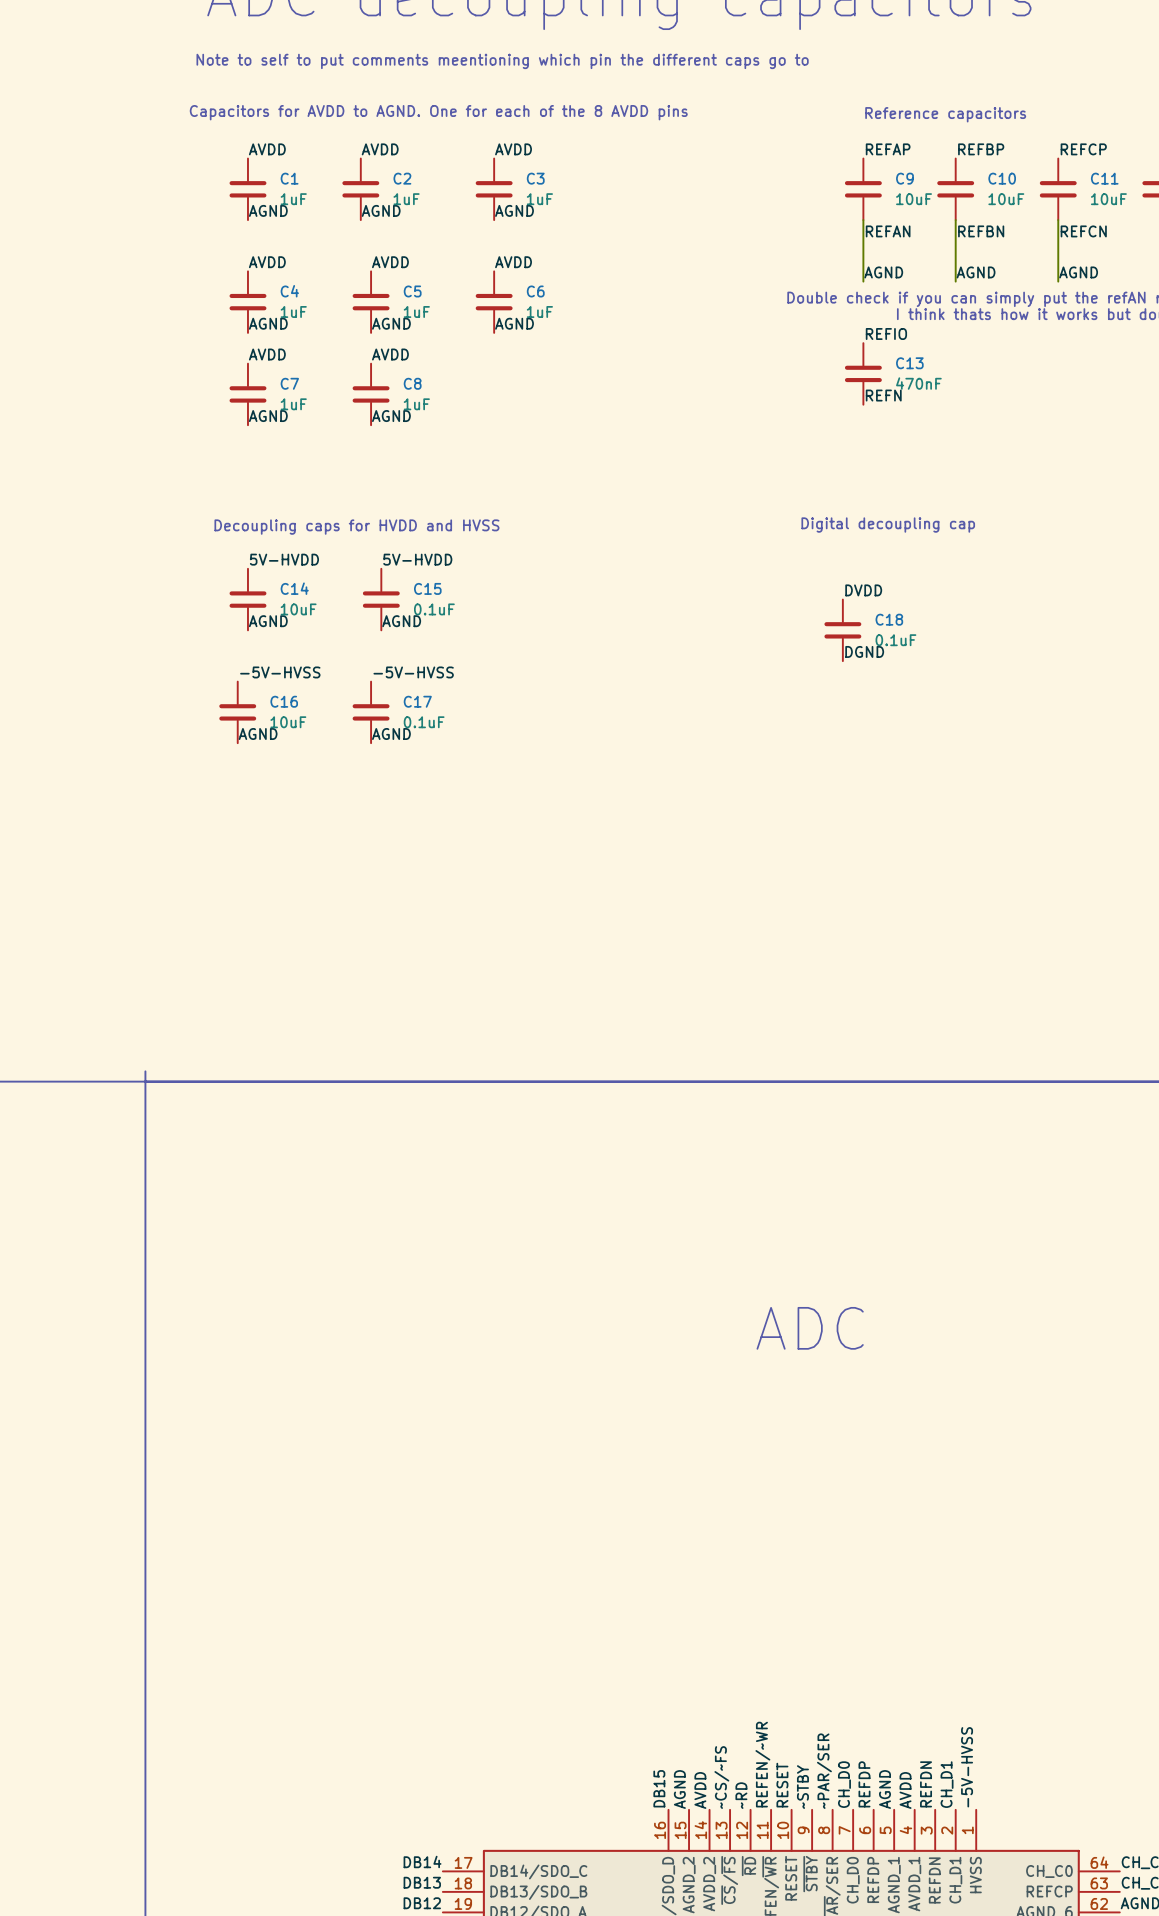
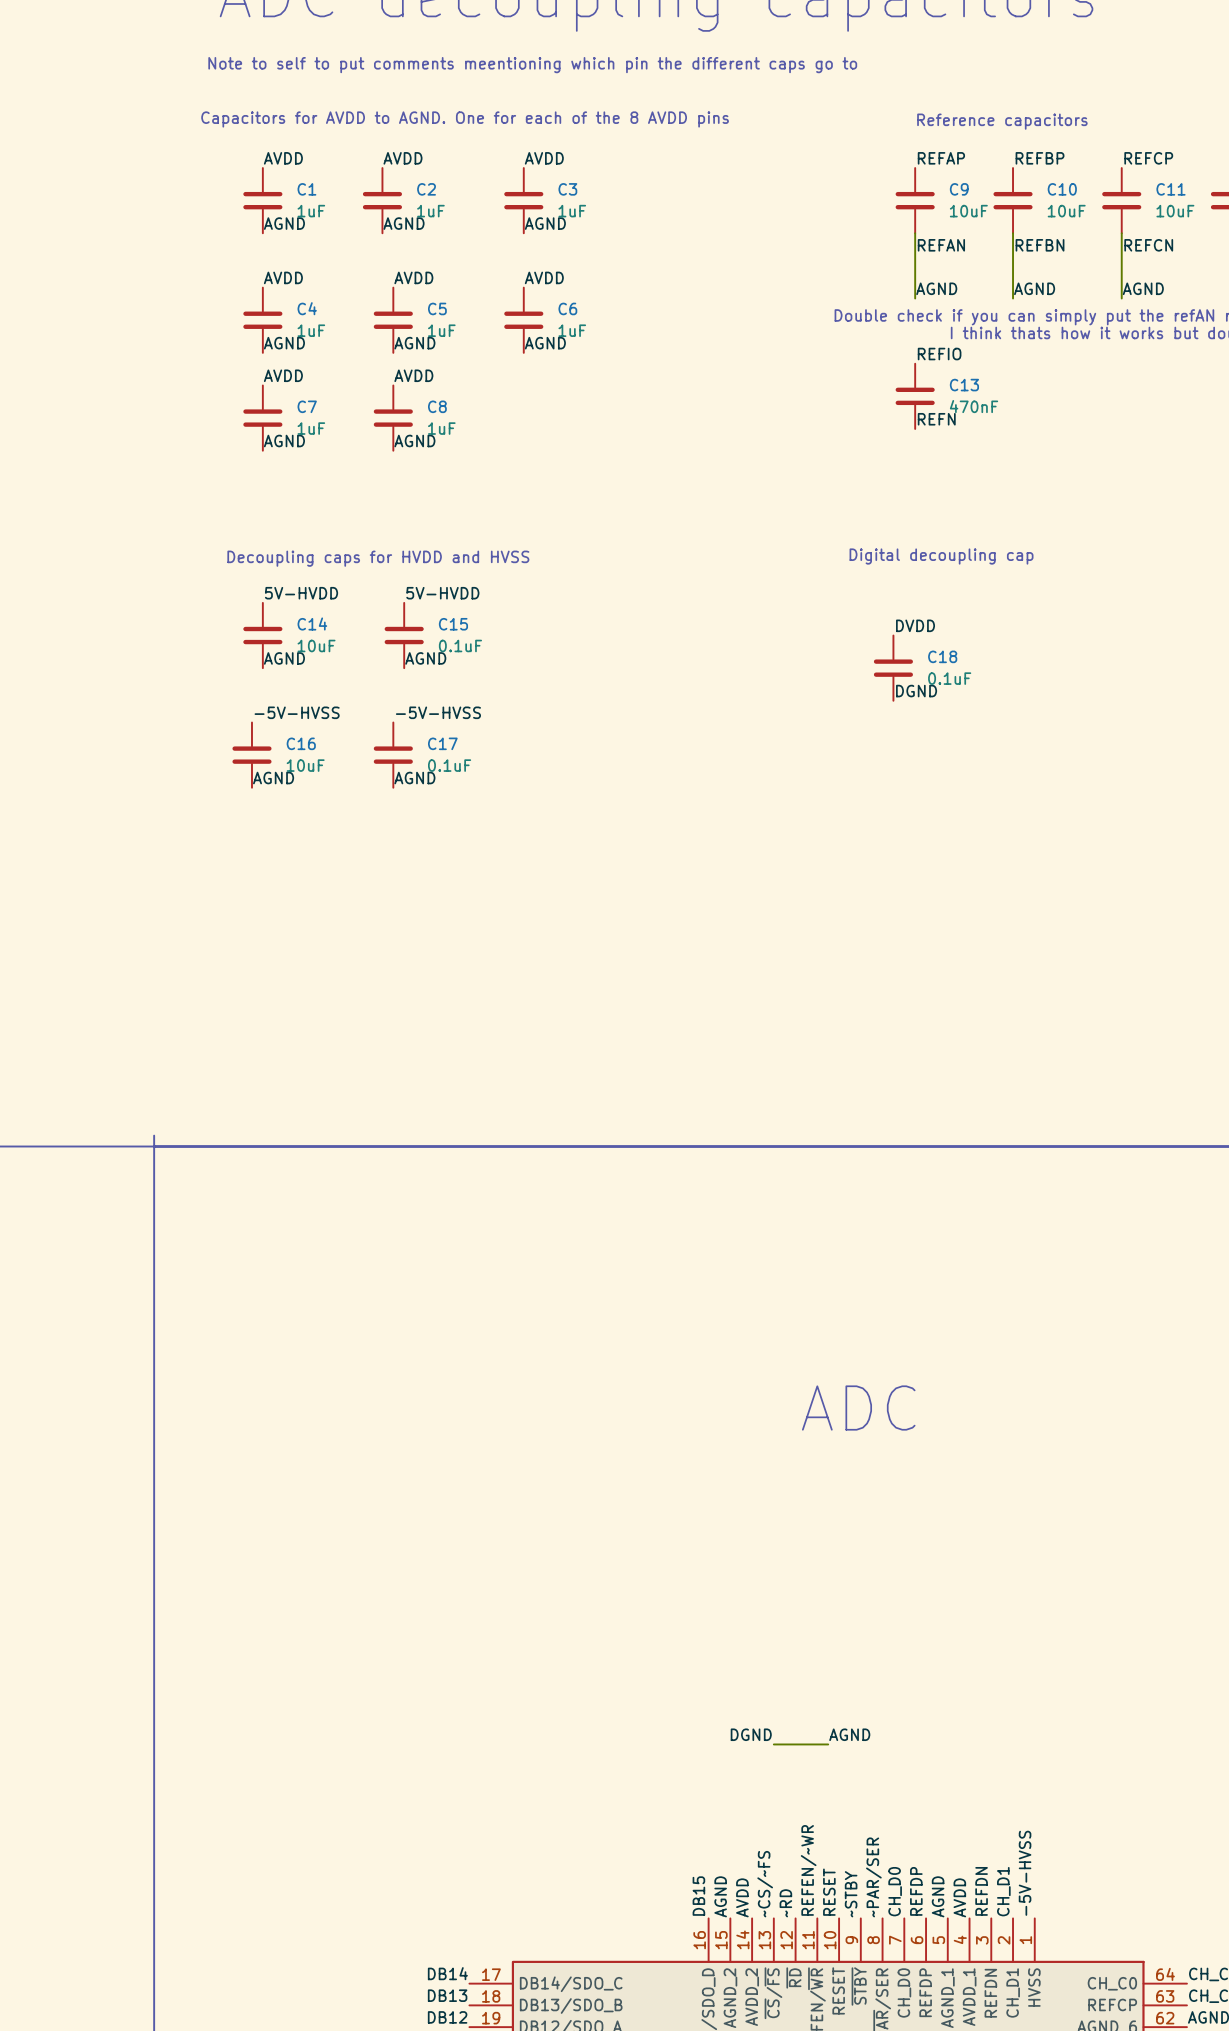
label: none -> DGND (751, 1734)
label: none -> AGND (849, 1734)
wire: none -> (773, 1744) (828, 1744)

